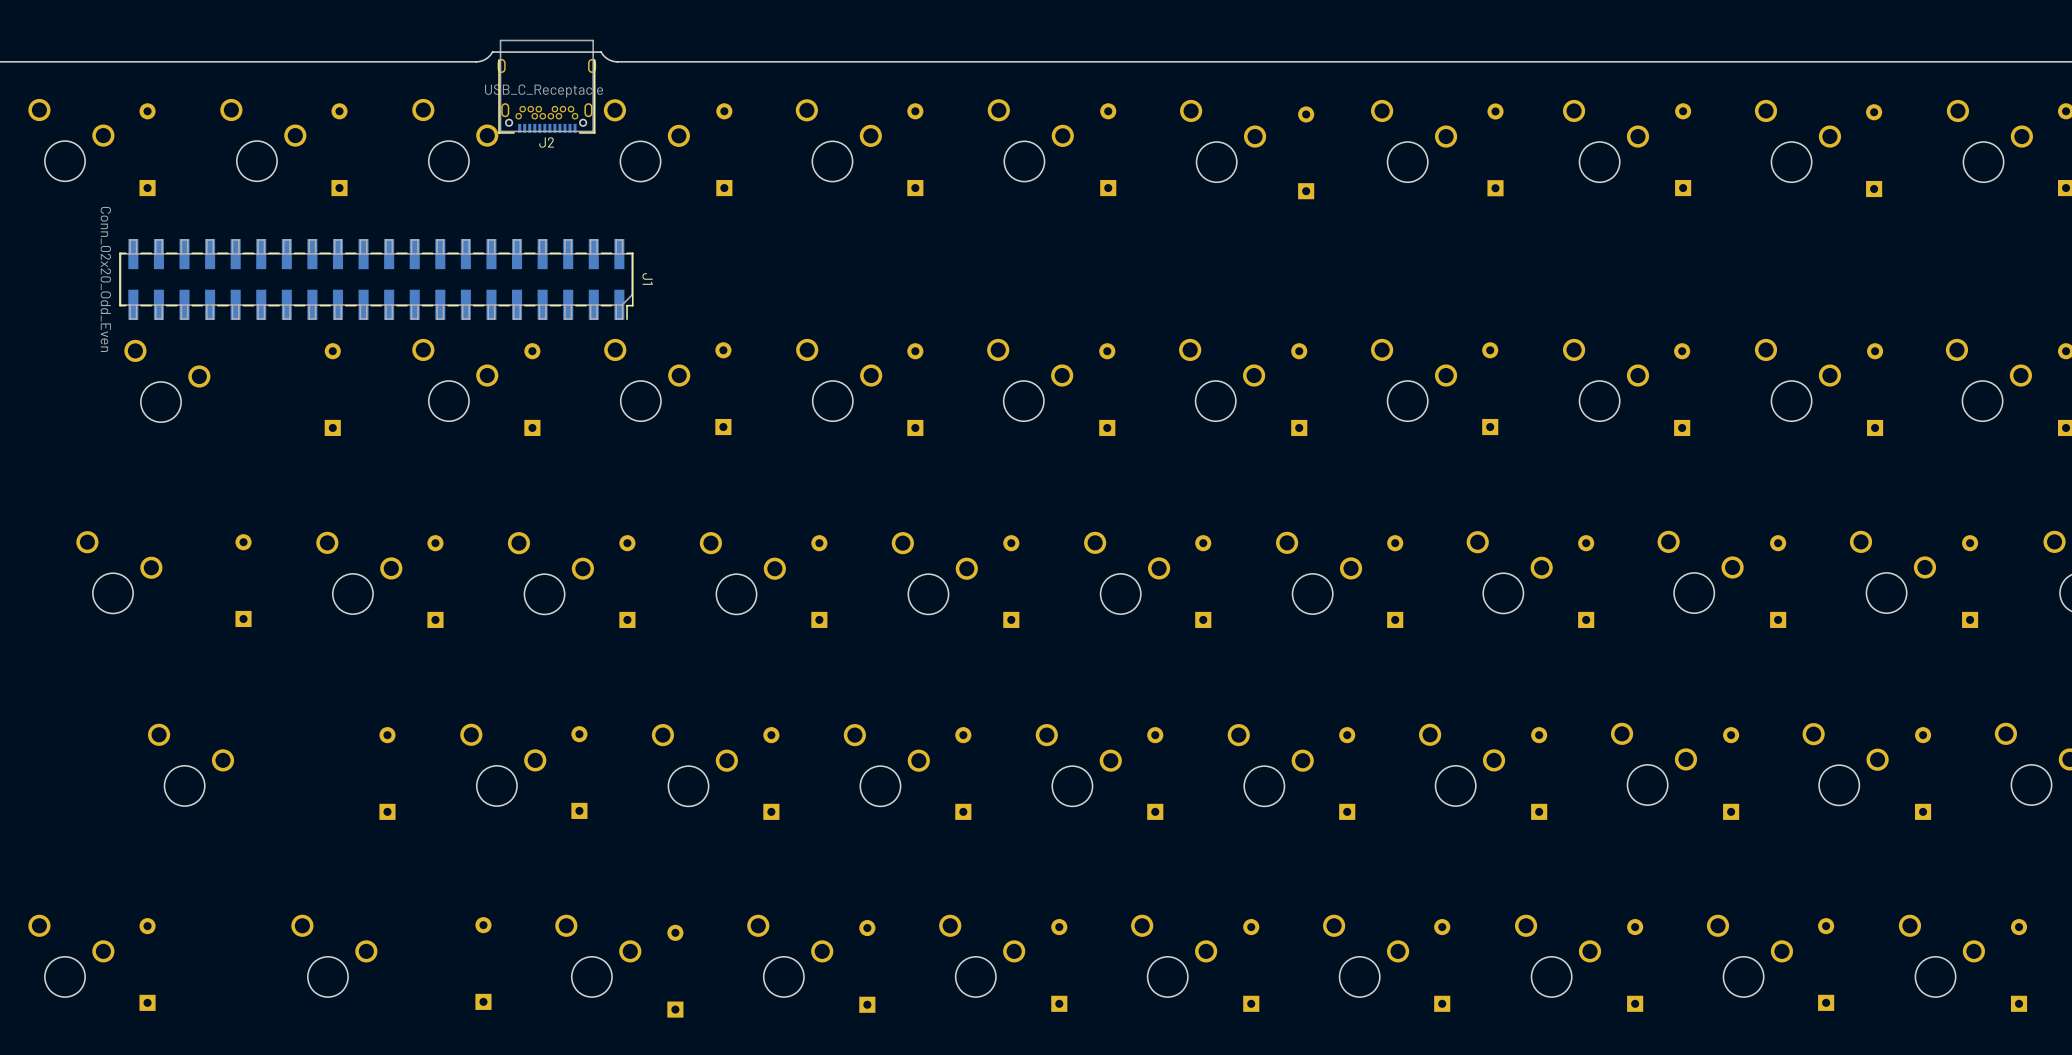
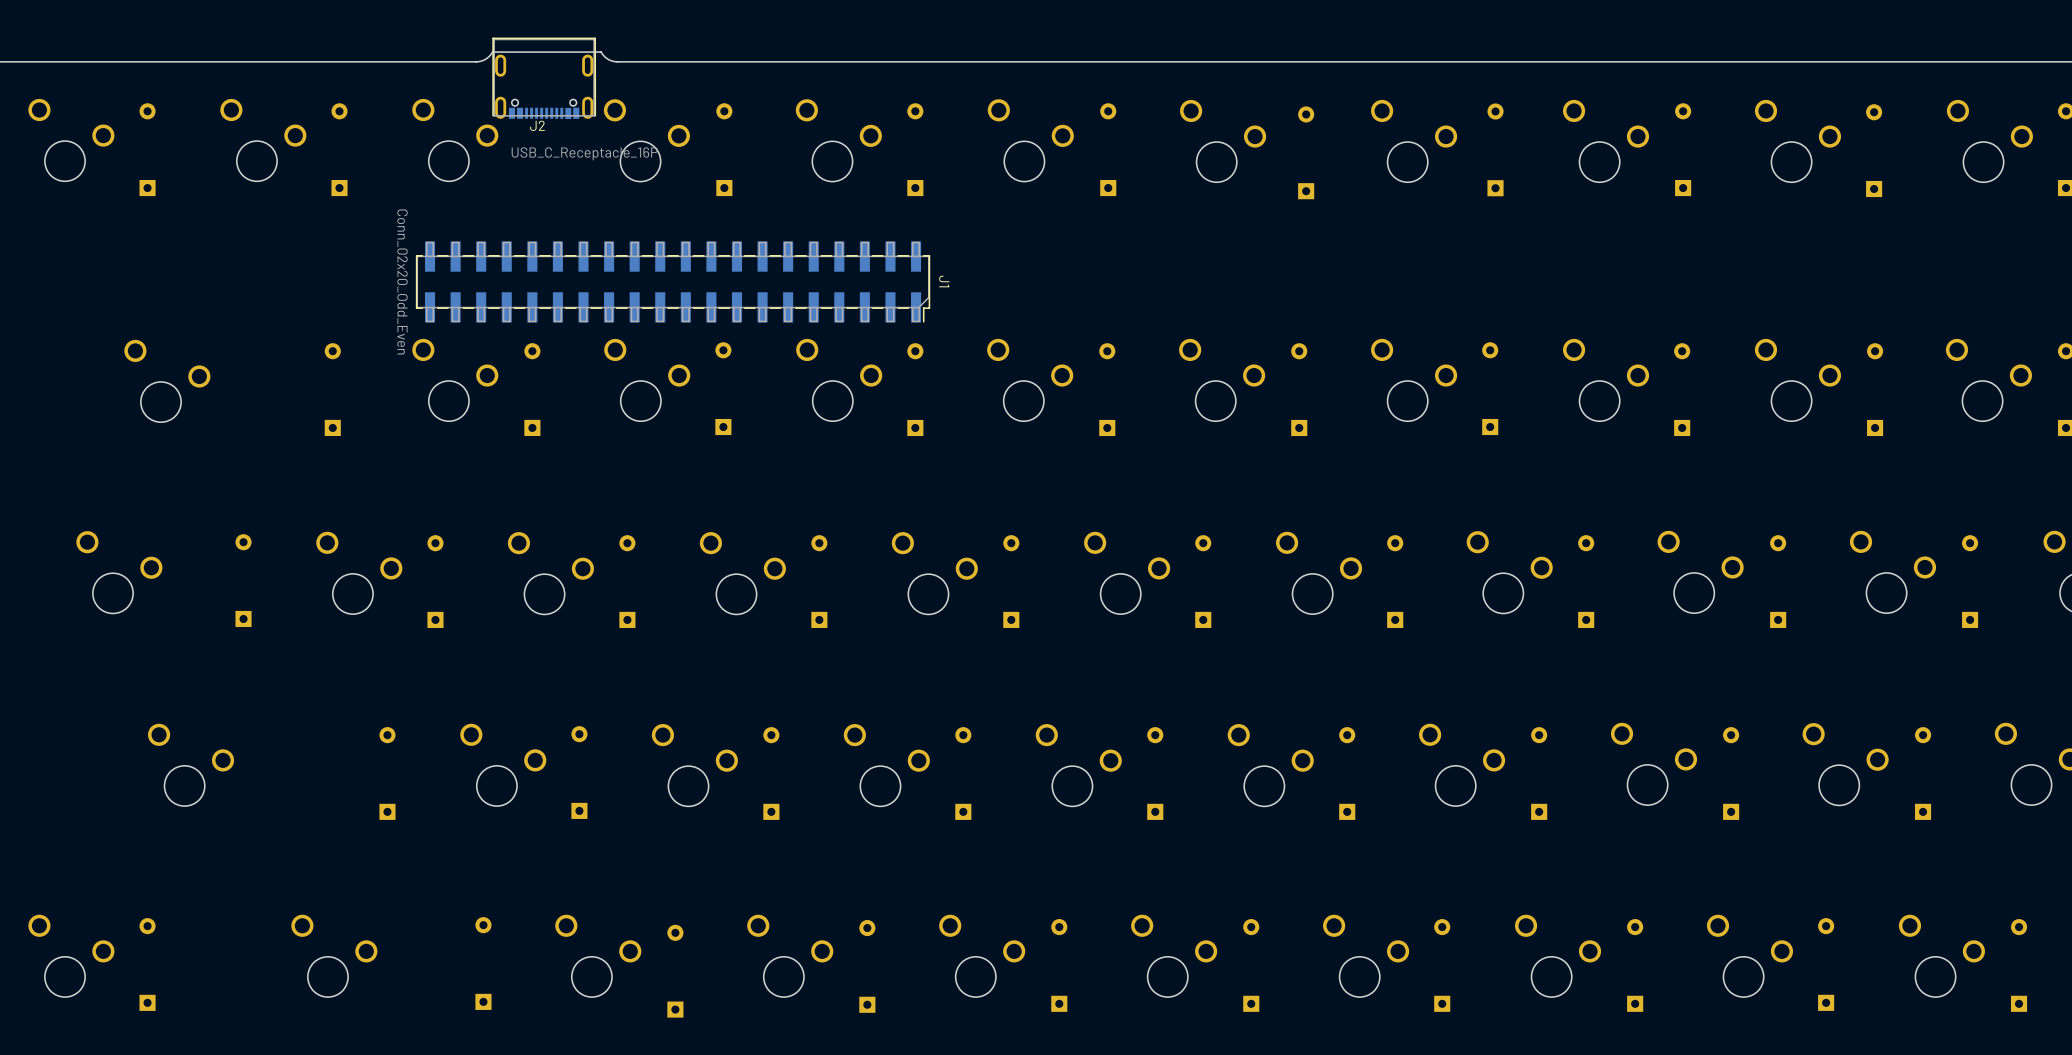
J2 footprint: [497, 39, 597, 134] -> [492, 37, 596, 120]
J2 value: USB_C_Receptacle (544, 90) -> USB_C_Receptacle_16P (584, 153)
J1 position: (376, 279) -> (673, 281)

